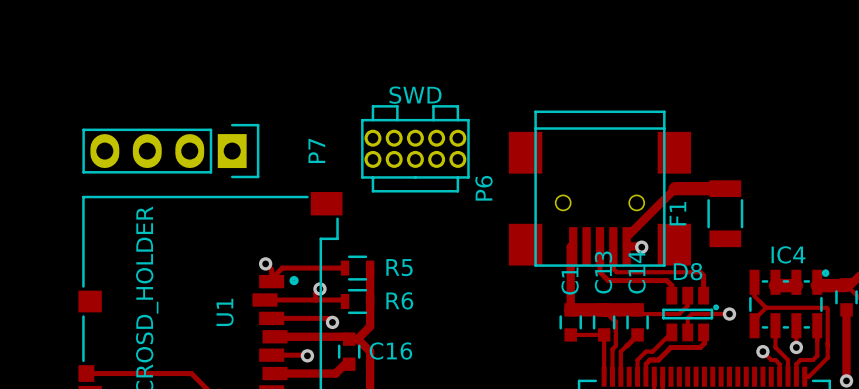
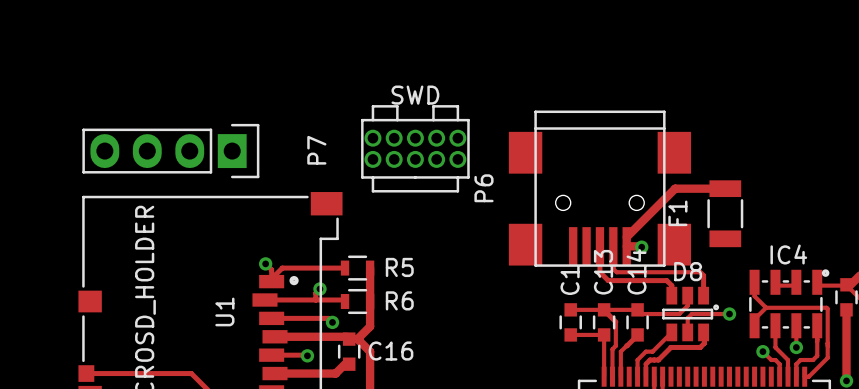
track width: thick (675, 188) (725, 188) -> thin (675, 188) (725, 188)
track: (573, 246) (570, 247) (570, 309) -> none
track width: thick (775, 285) (796, 285) -> thin (775, 285) (796, 285)
track width: thick (817, 285) (845, 285) -> thin (817, 285) (845, 285)
track width: thick (570, 309) (637, 309) -> thin (570, 309) (637, 309)

